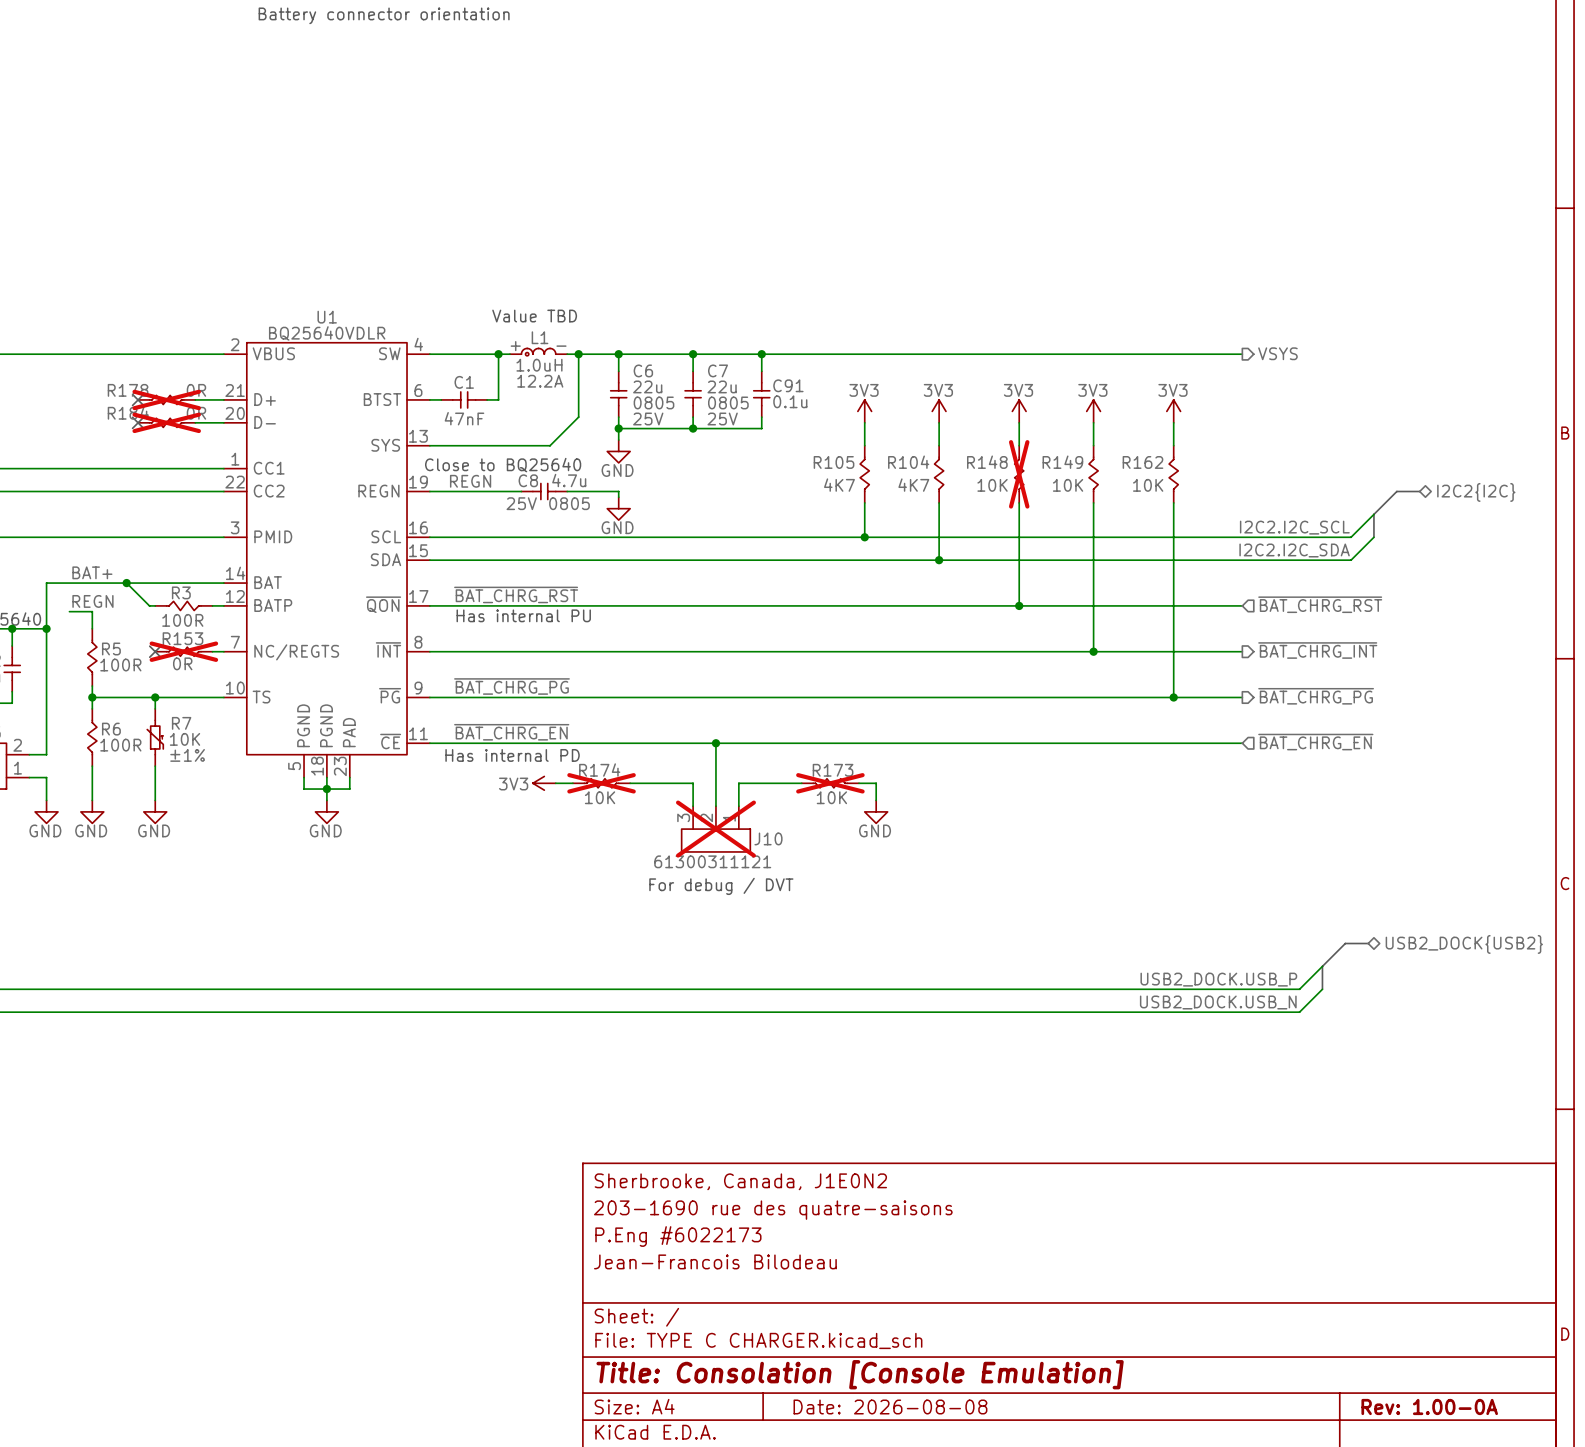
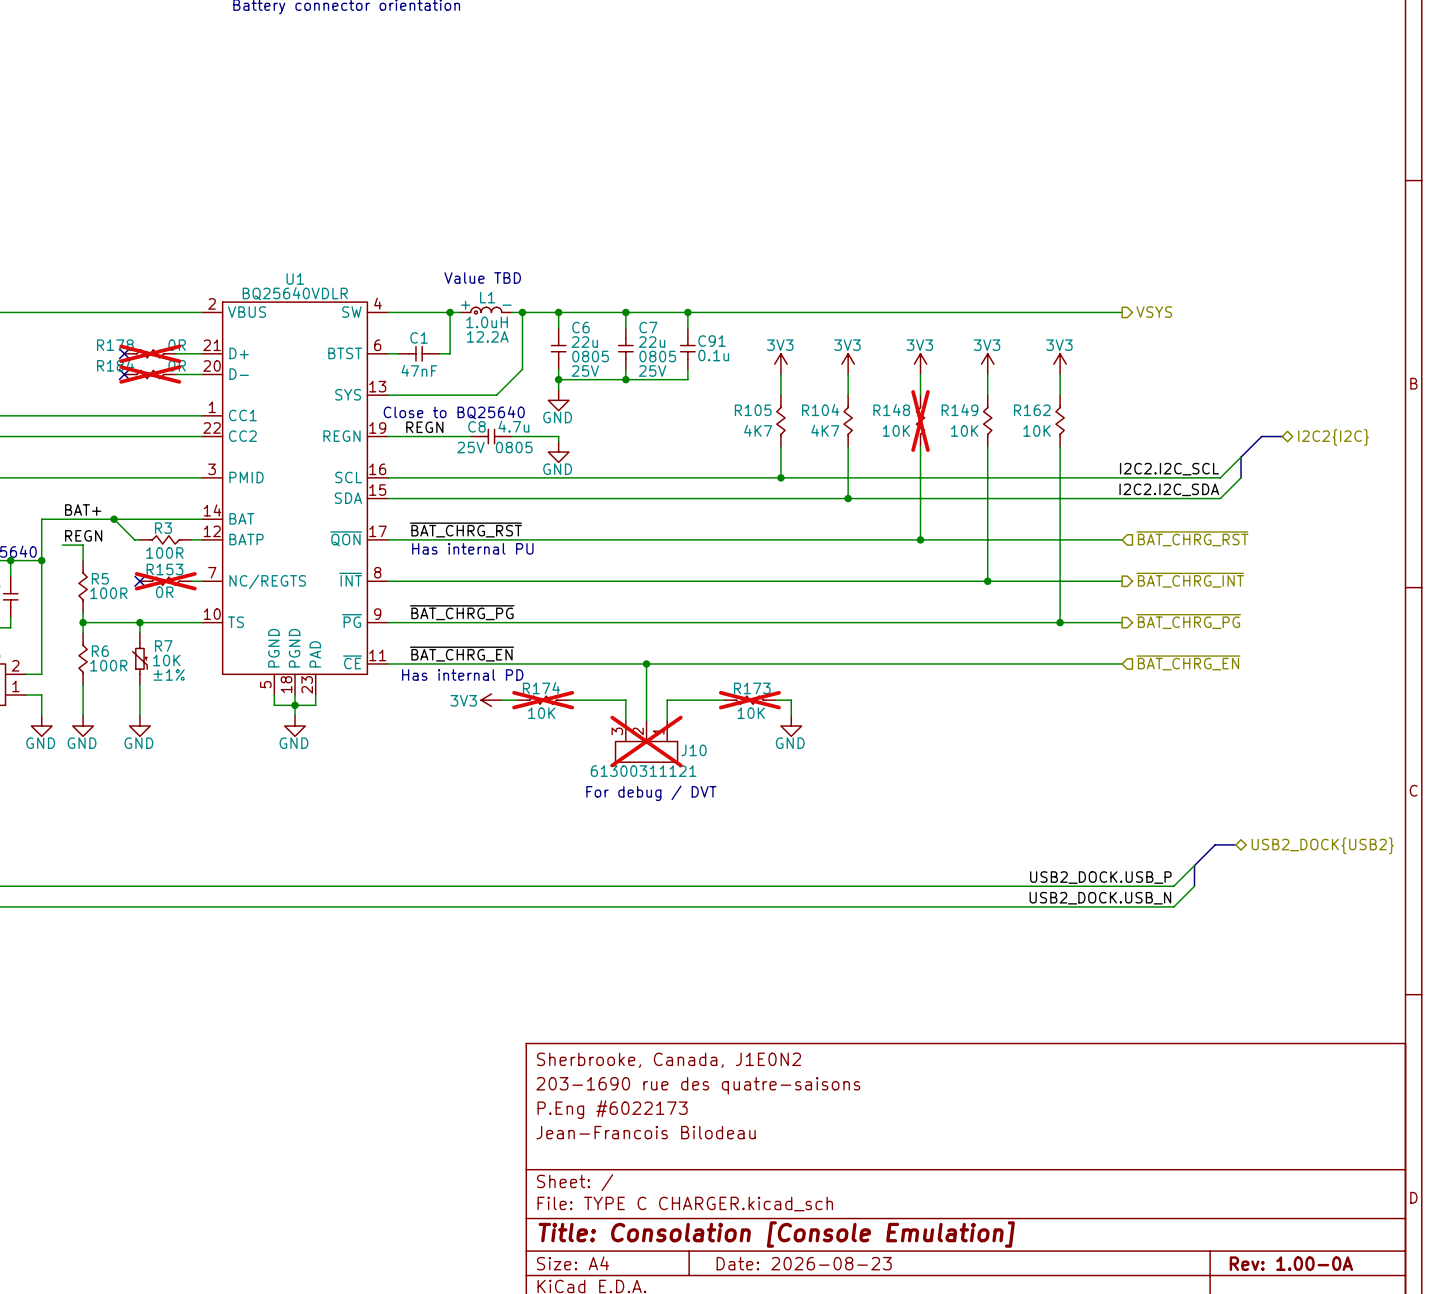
title block: Date: 2026-08-08 (890, 1406) -> Date: 2026-08-23 (804, 1263)

